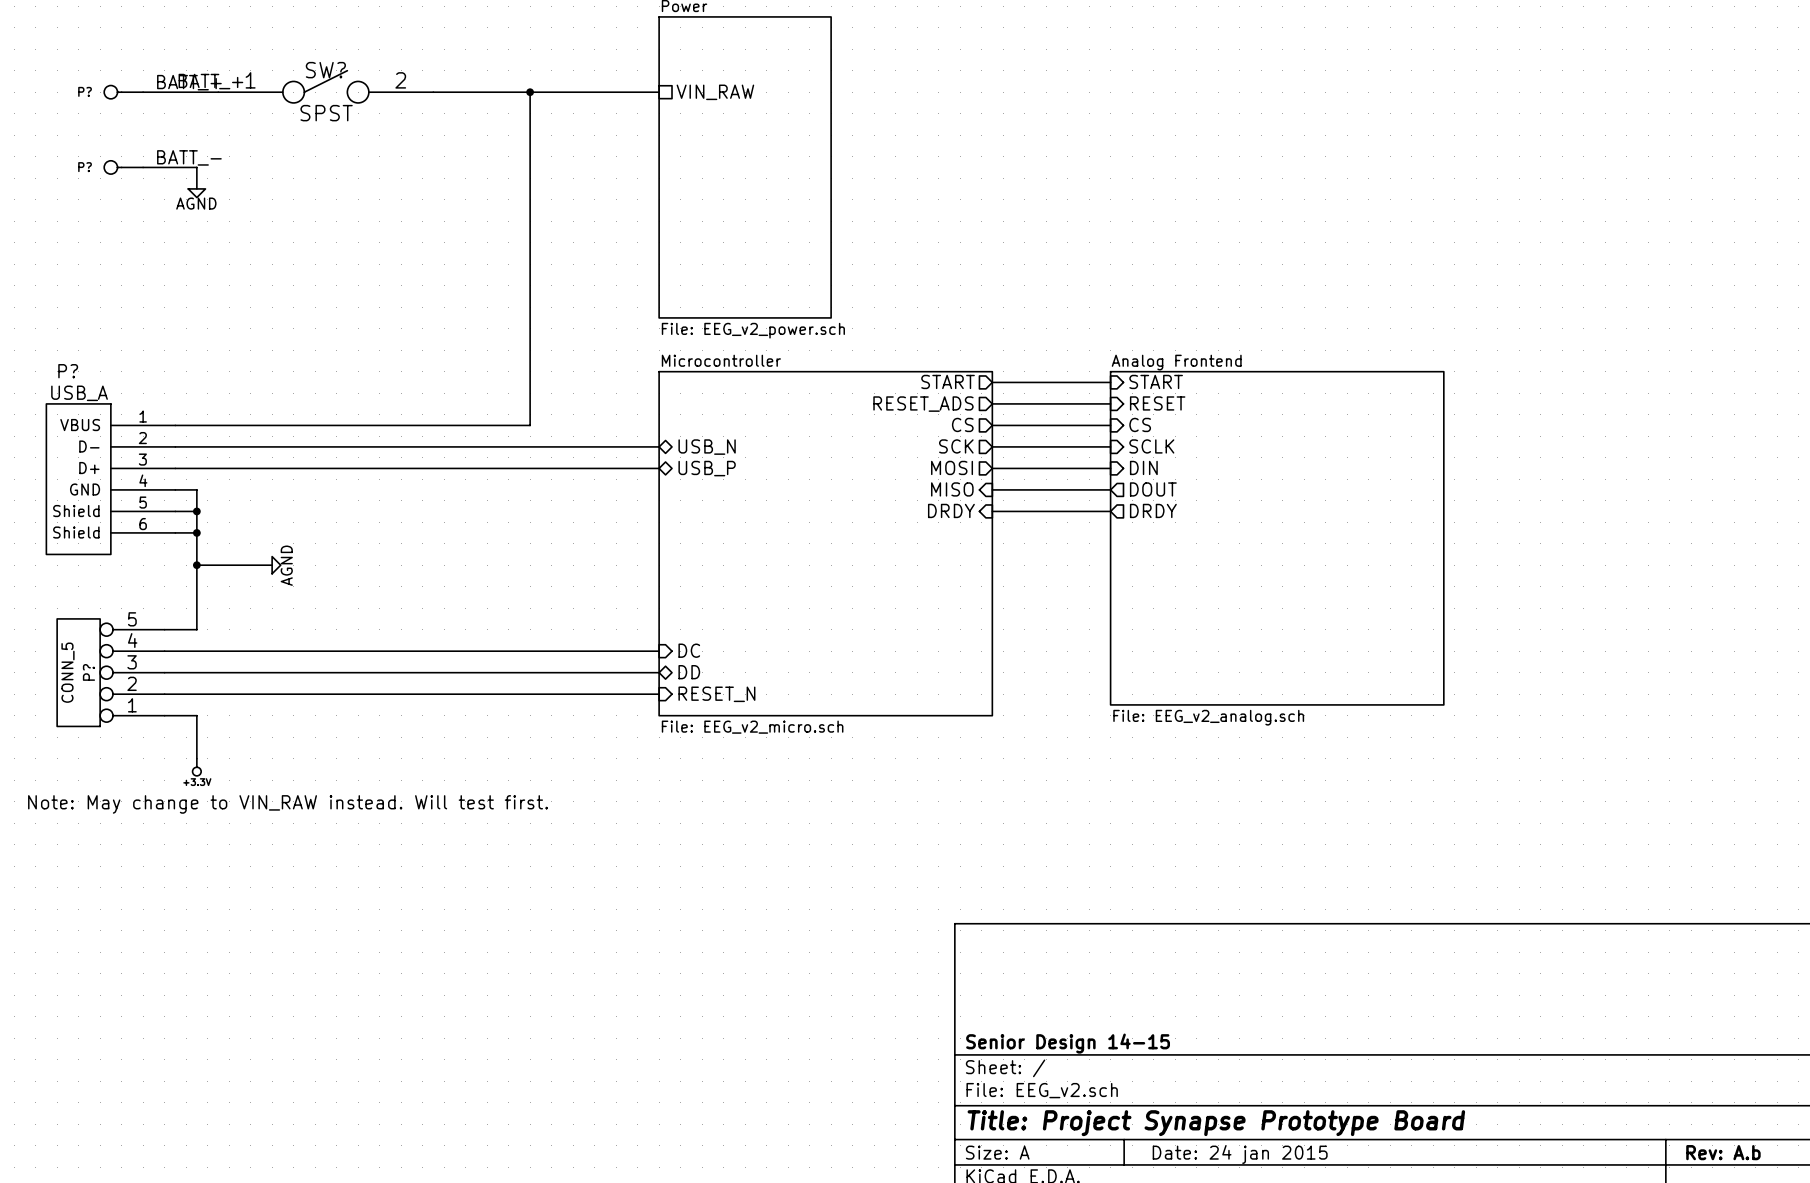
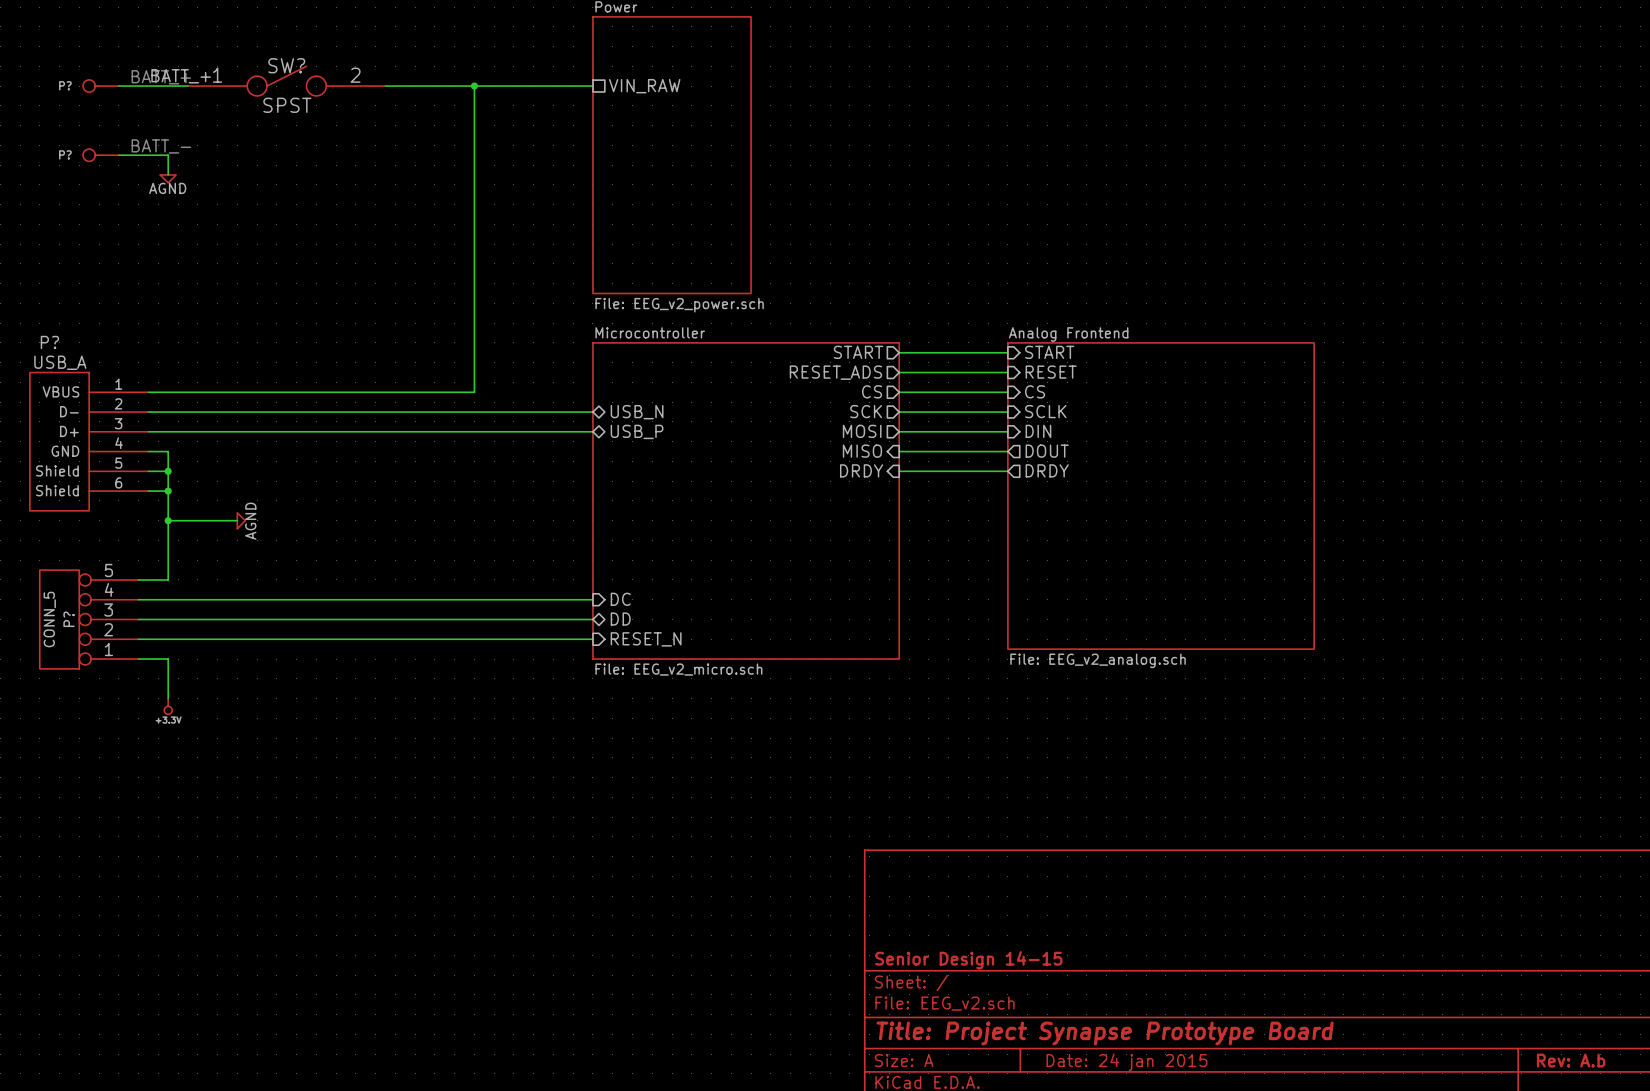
text: Note: May change to VIN_RAW instead. Will test first. (288, 804) -> none

